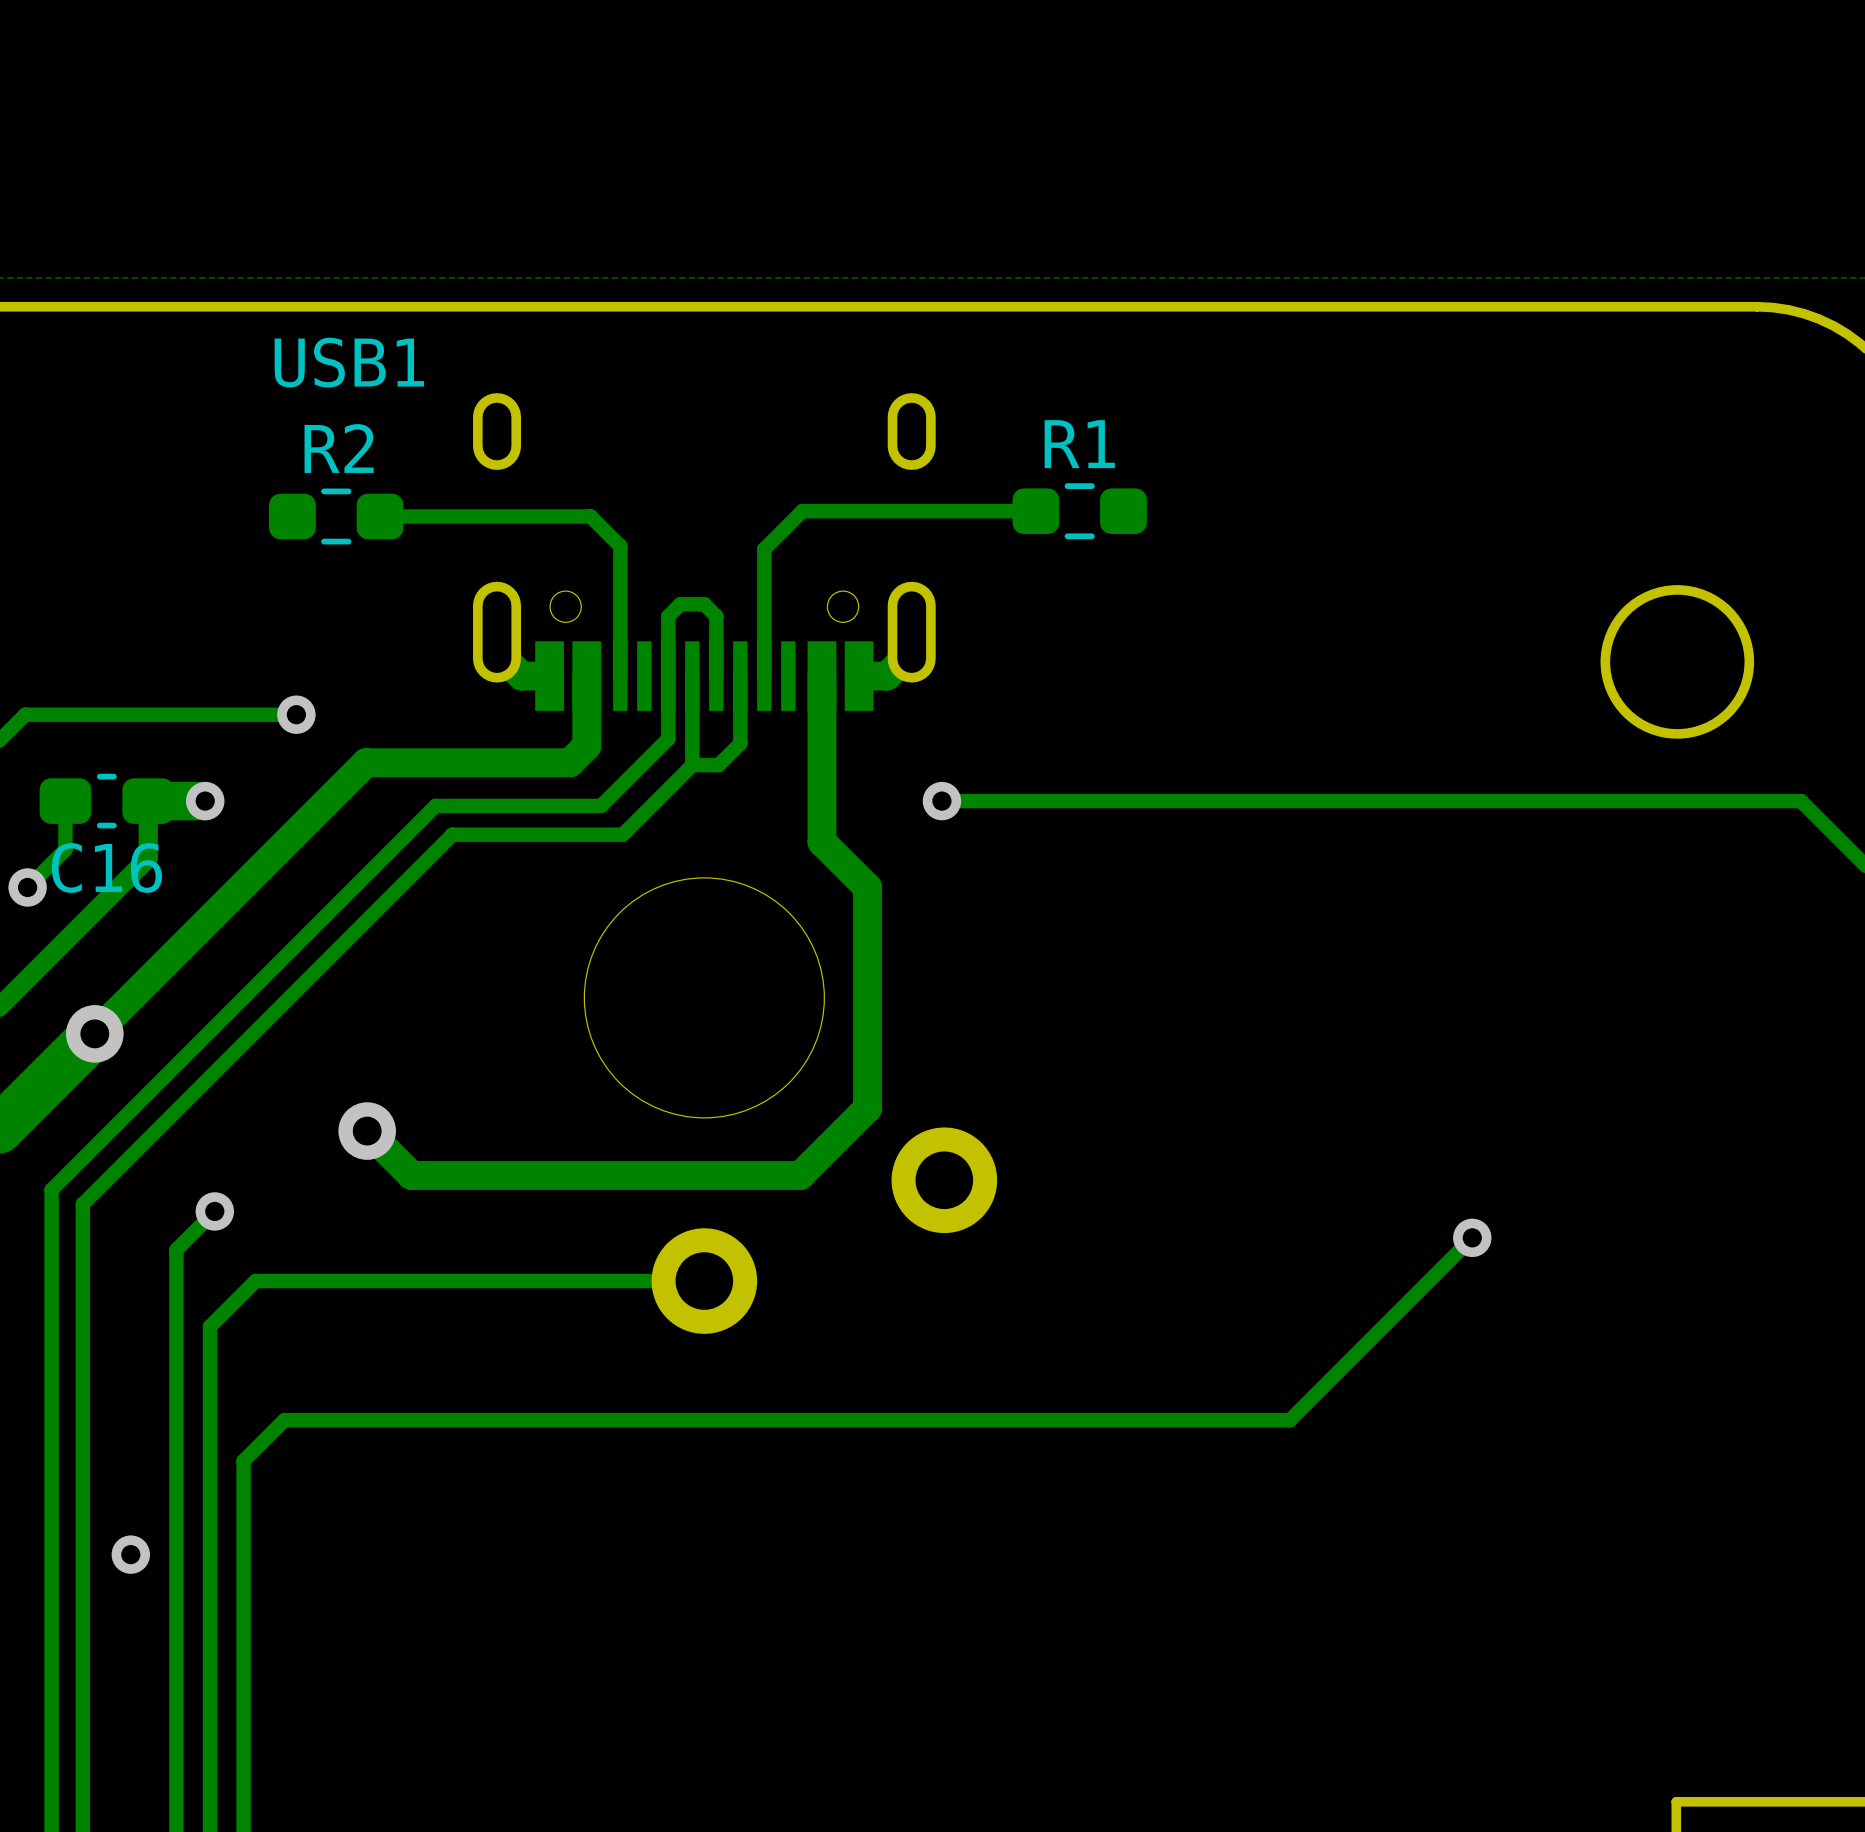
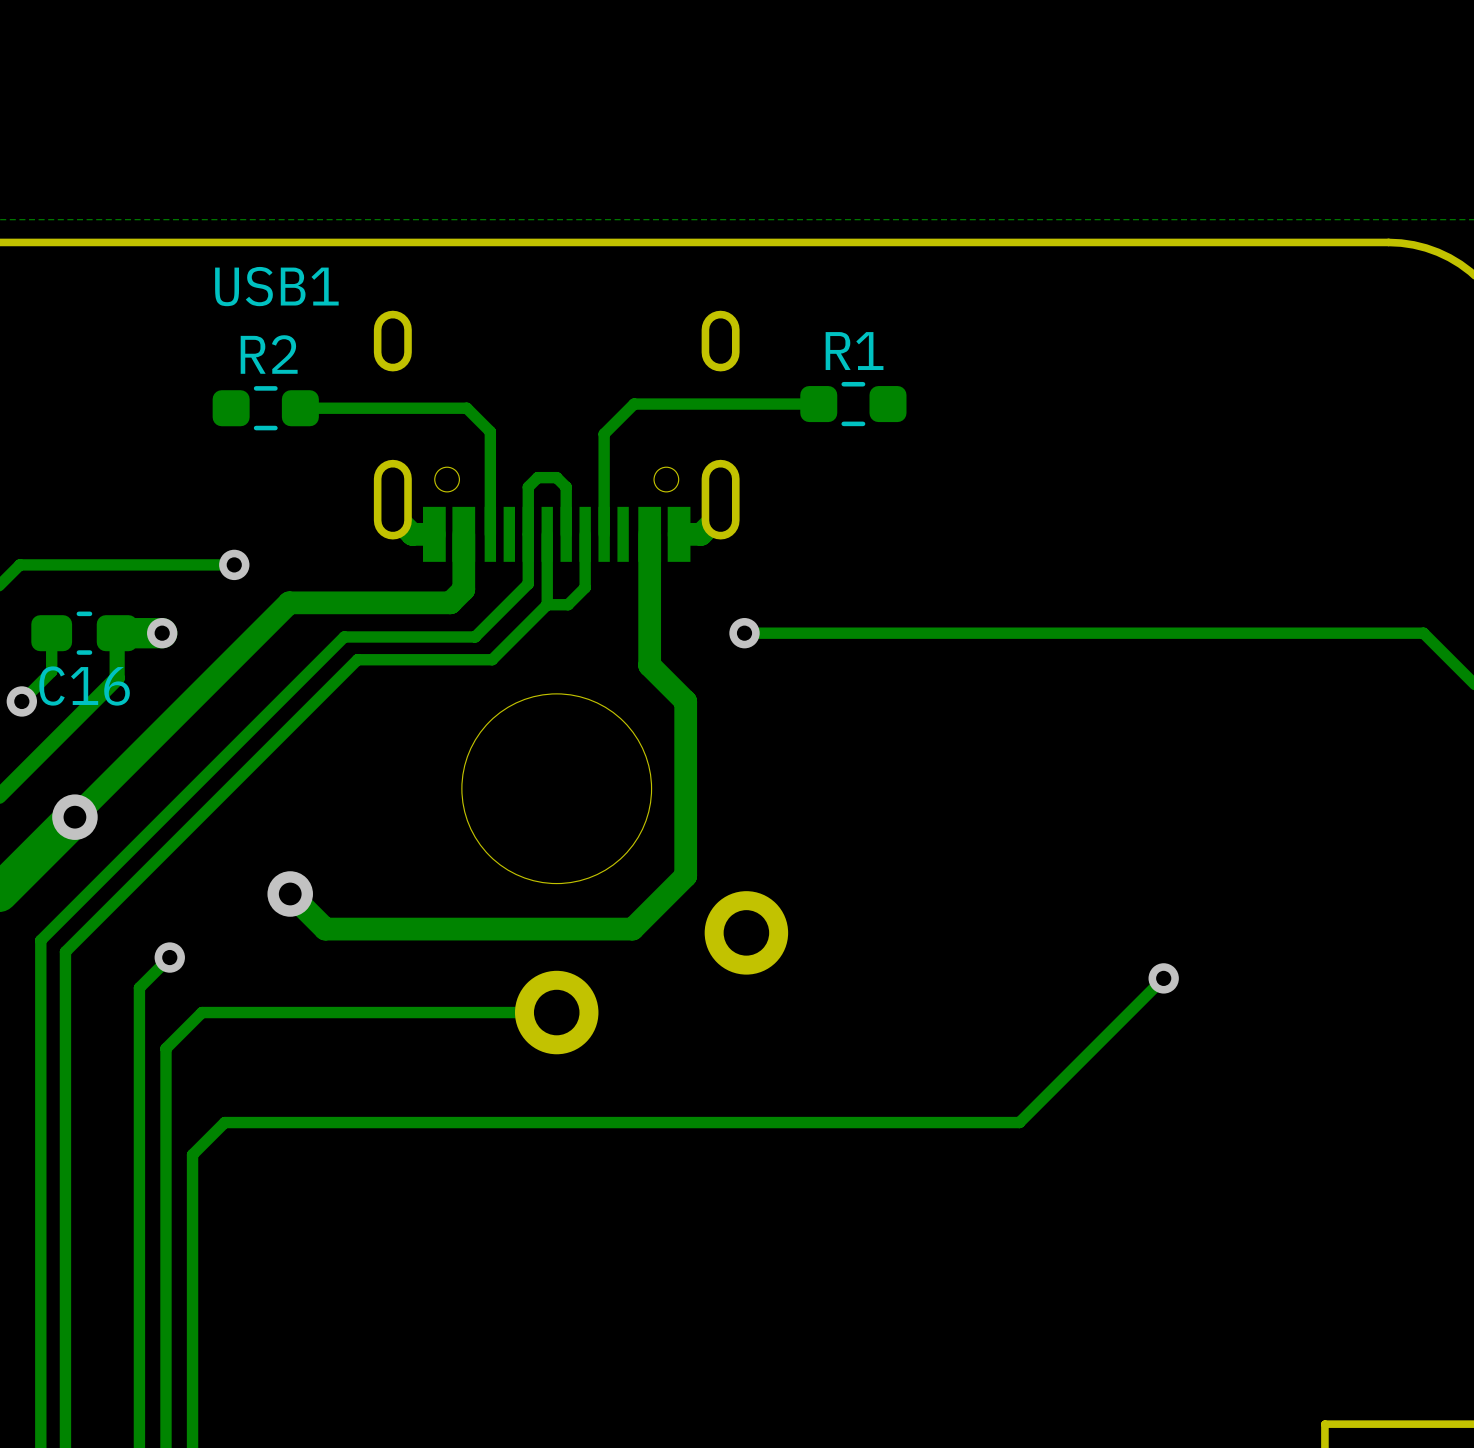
round board edge: [1600, 585, 1755, 739] -> none
via: (130, 1554) -> none

